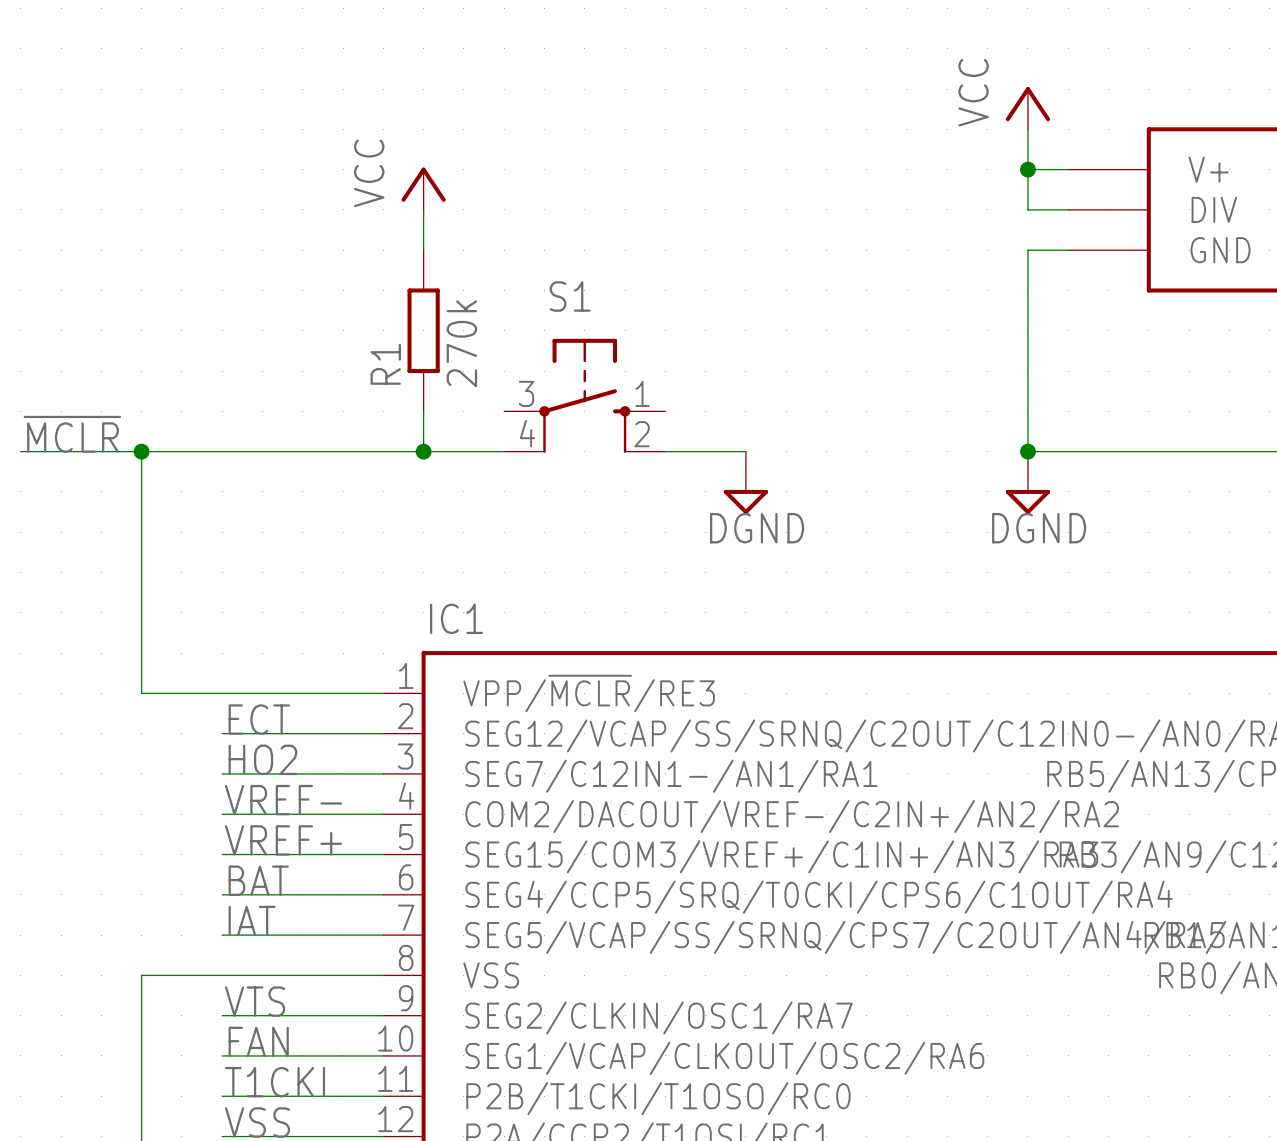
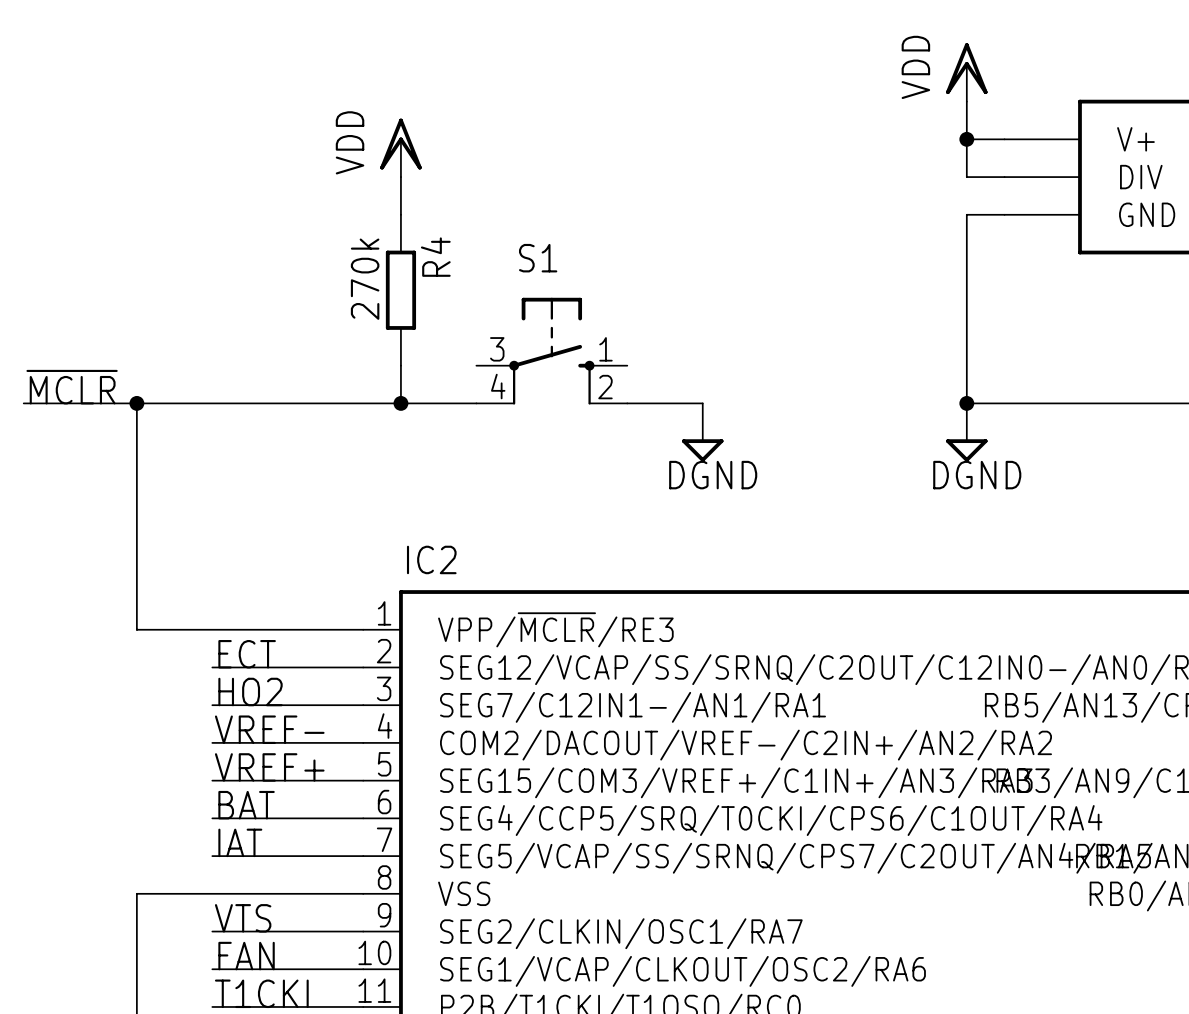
power symbol: VCC (1027, 108) -> VDD (966, 72)
power symbol: VCC (423, 188) -> VDD (400, 147)
R1 value position: 270k (461, 343) -> 270k (365, 279)
R1 name: R1 (385, 364) -> R4 (435, 257)
IC1 name: IC1 (456, 618) -> IC2 (431, 559)

